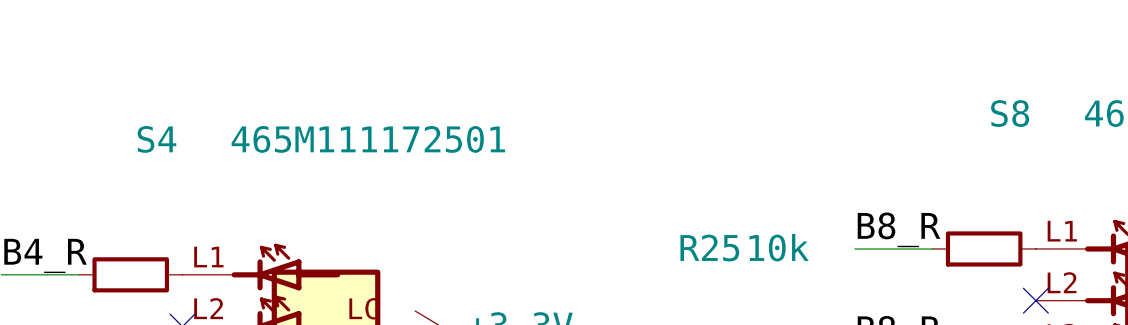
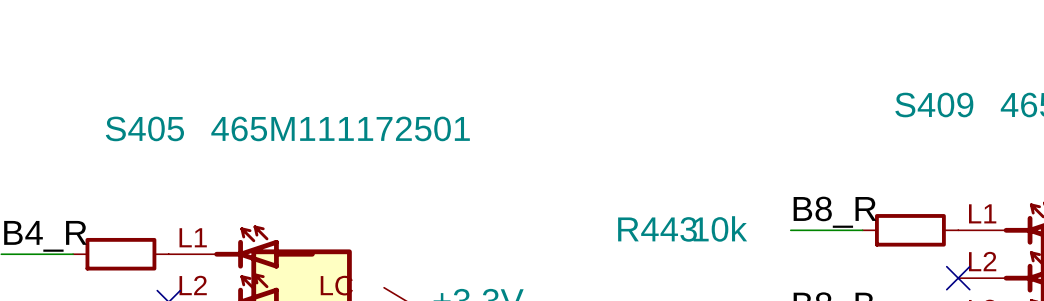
S8 name: S8 (1010, 113) -> S409 (934, 105)
S4 name: S4 (156, 139) -> S405 (144, 128)
R25 name: R25 (709, 248) -> R443 (657, 229)

